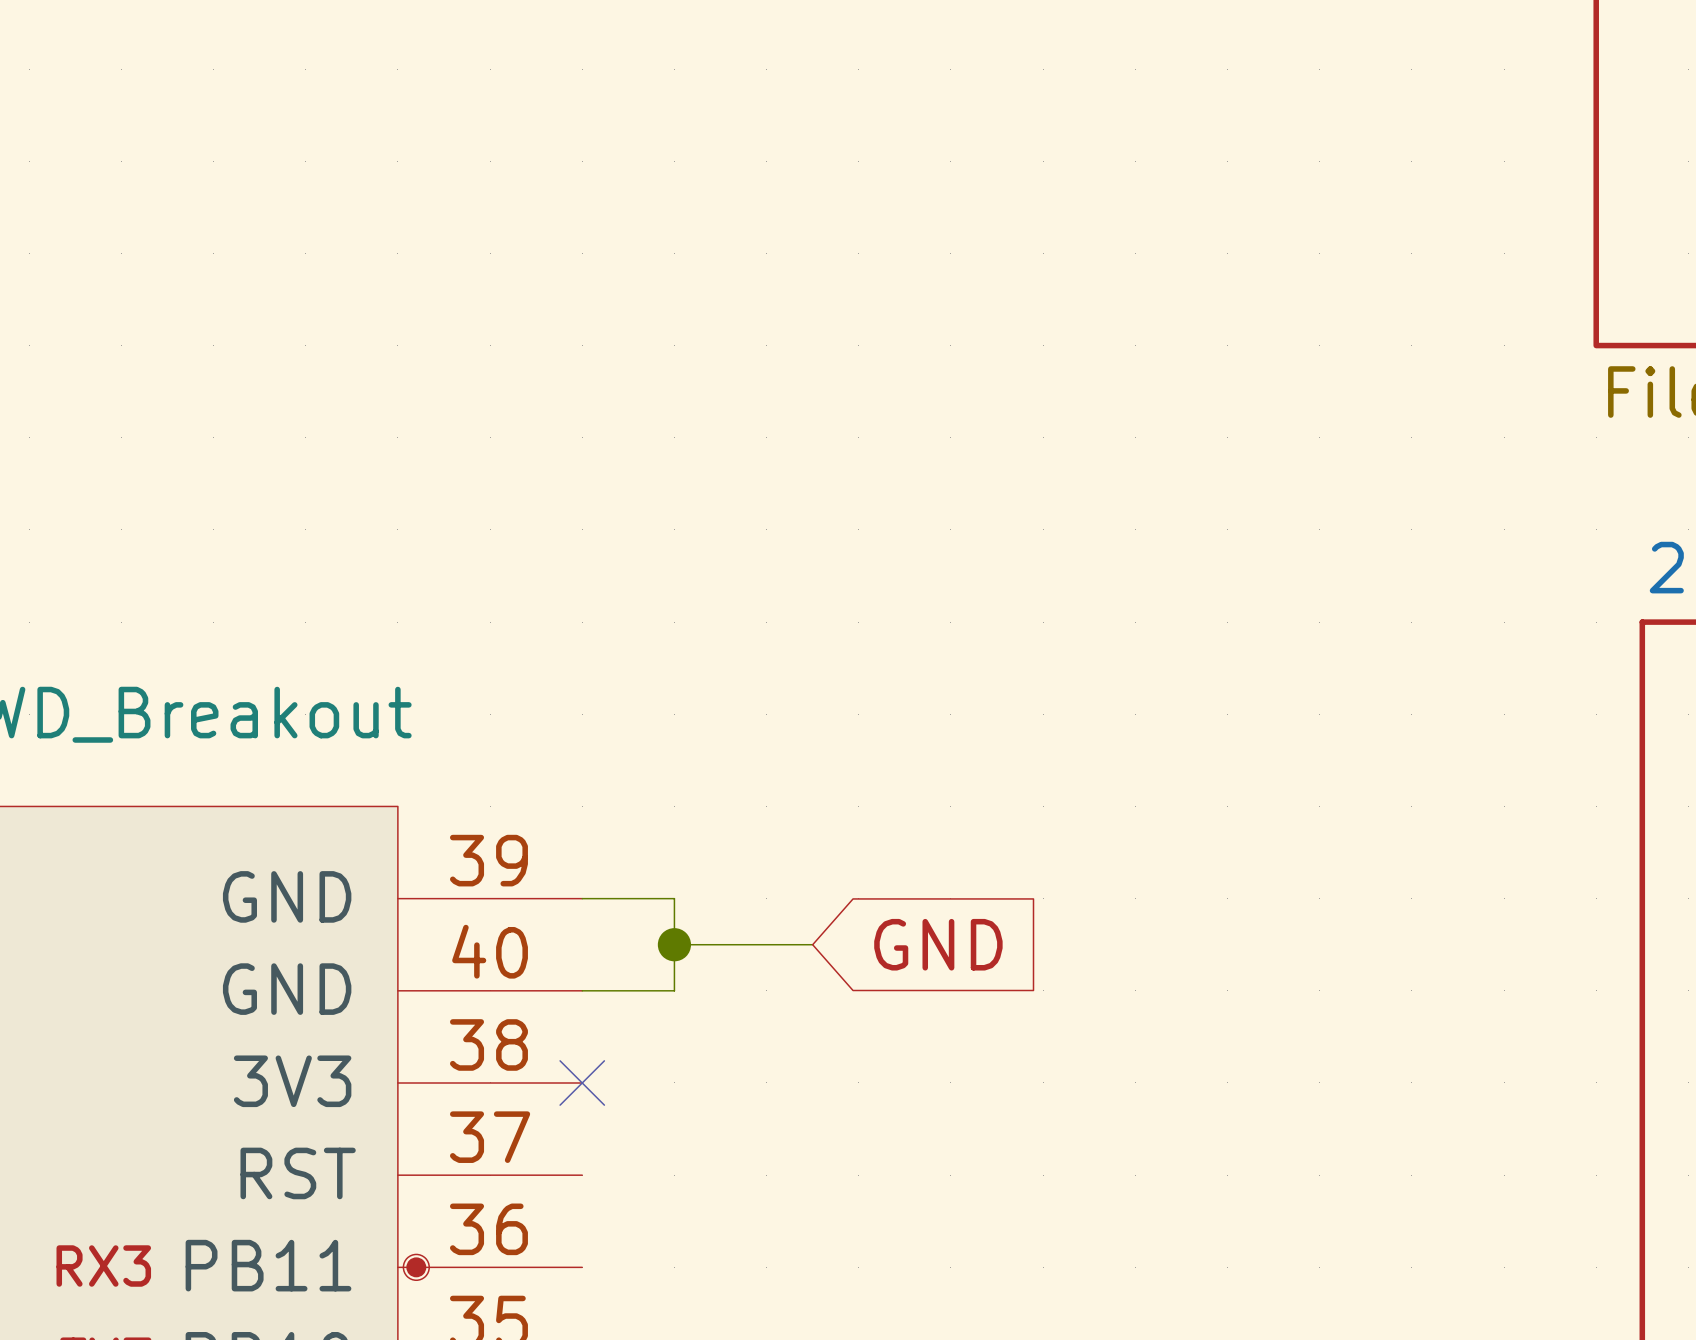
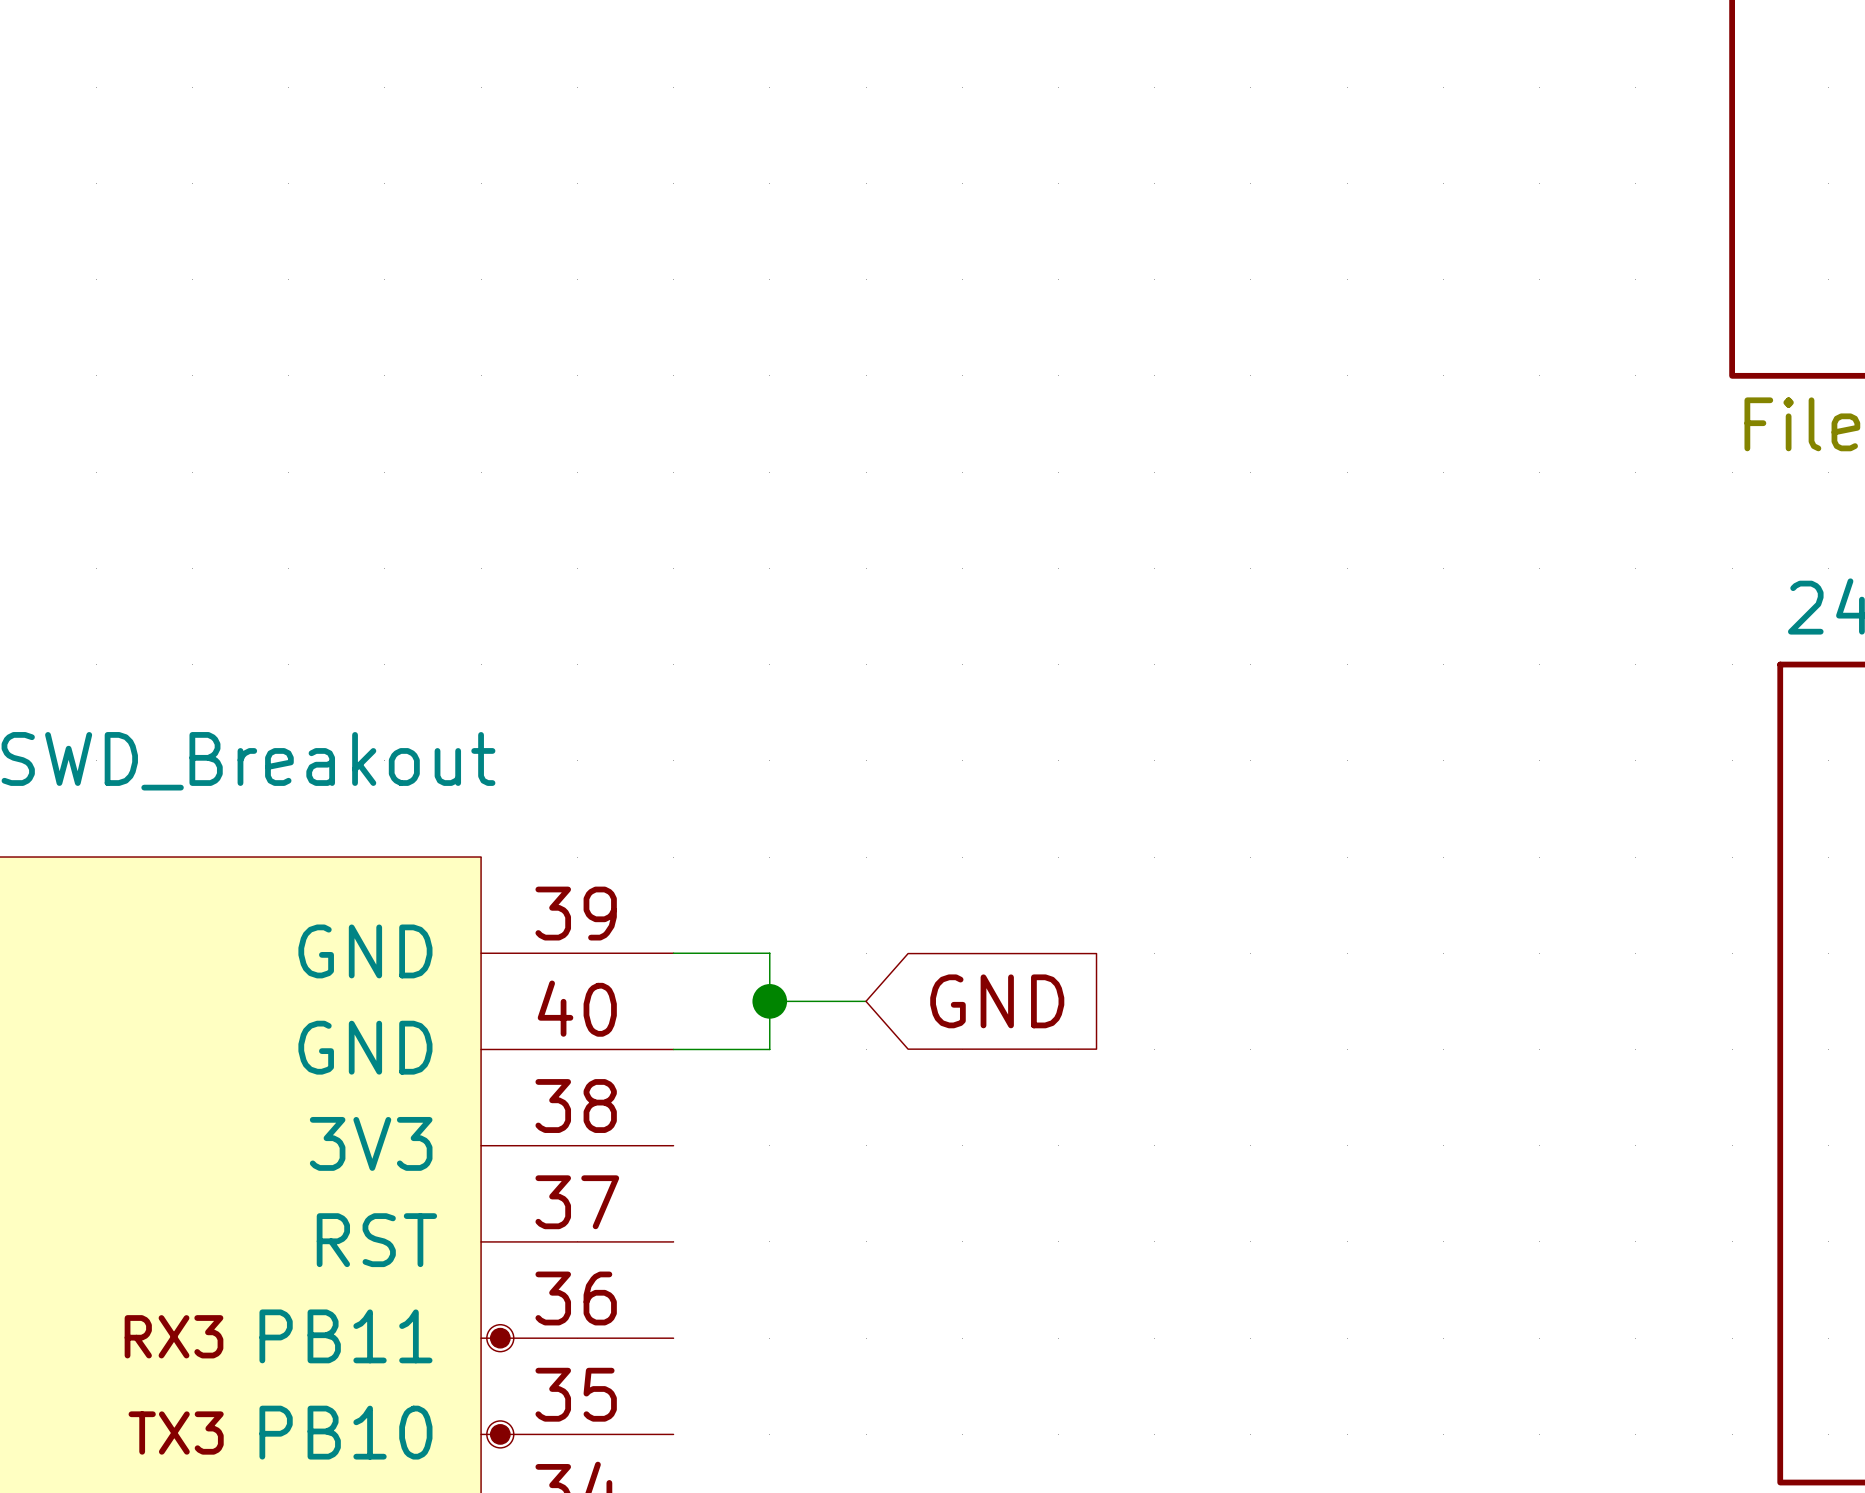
wire: (766, 944) (812, 944) -> none
global label position: GND (938, 944) -> GND (997, 1001)
no-connect mark: (582, 1082) -> none

